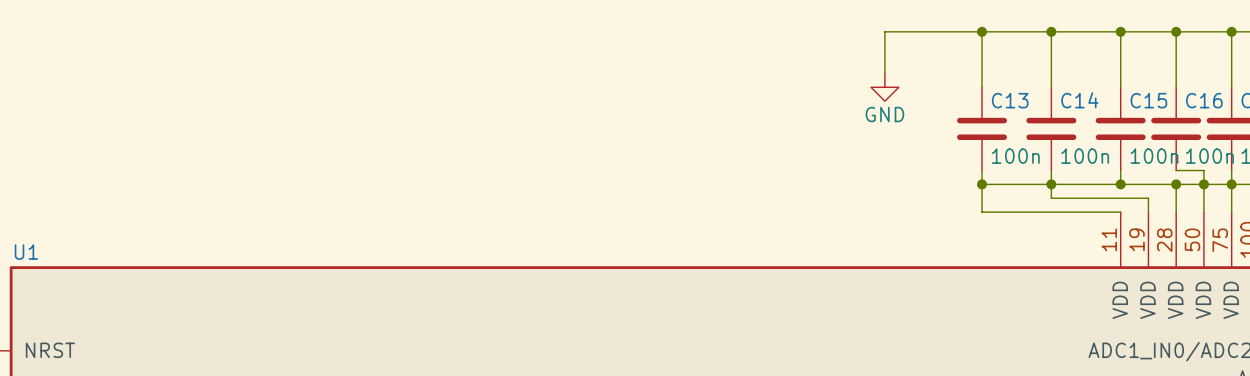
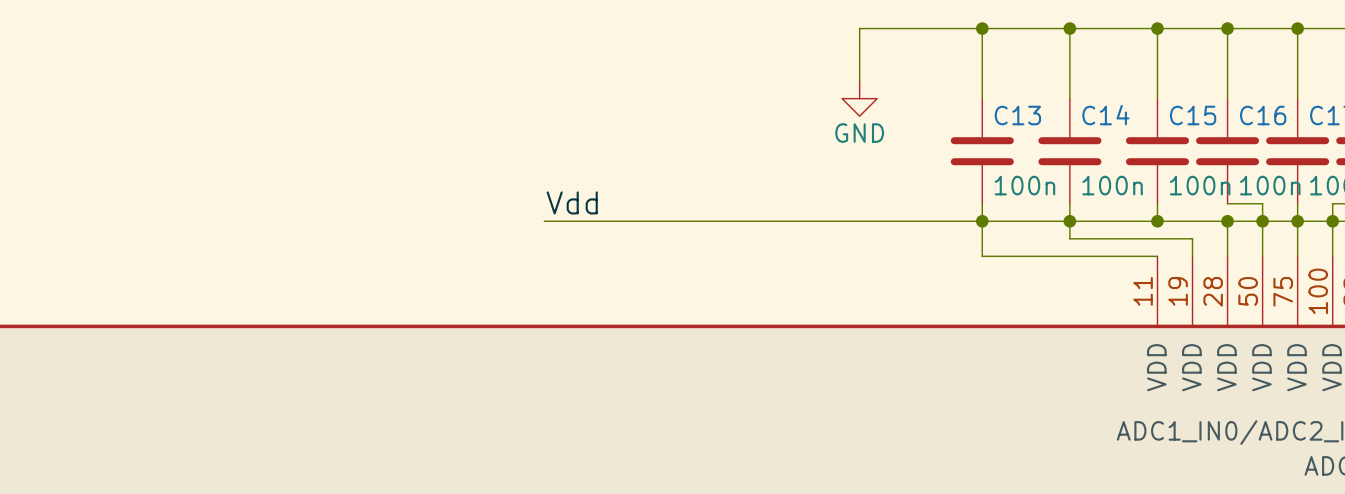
label: none -> Vdd (572, 202)
wire: none -> (544, 221) (982, 221)

